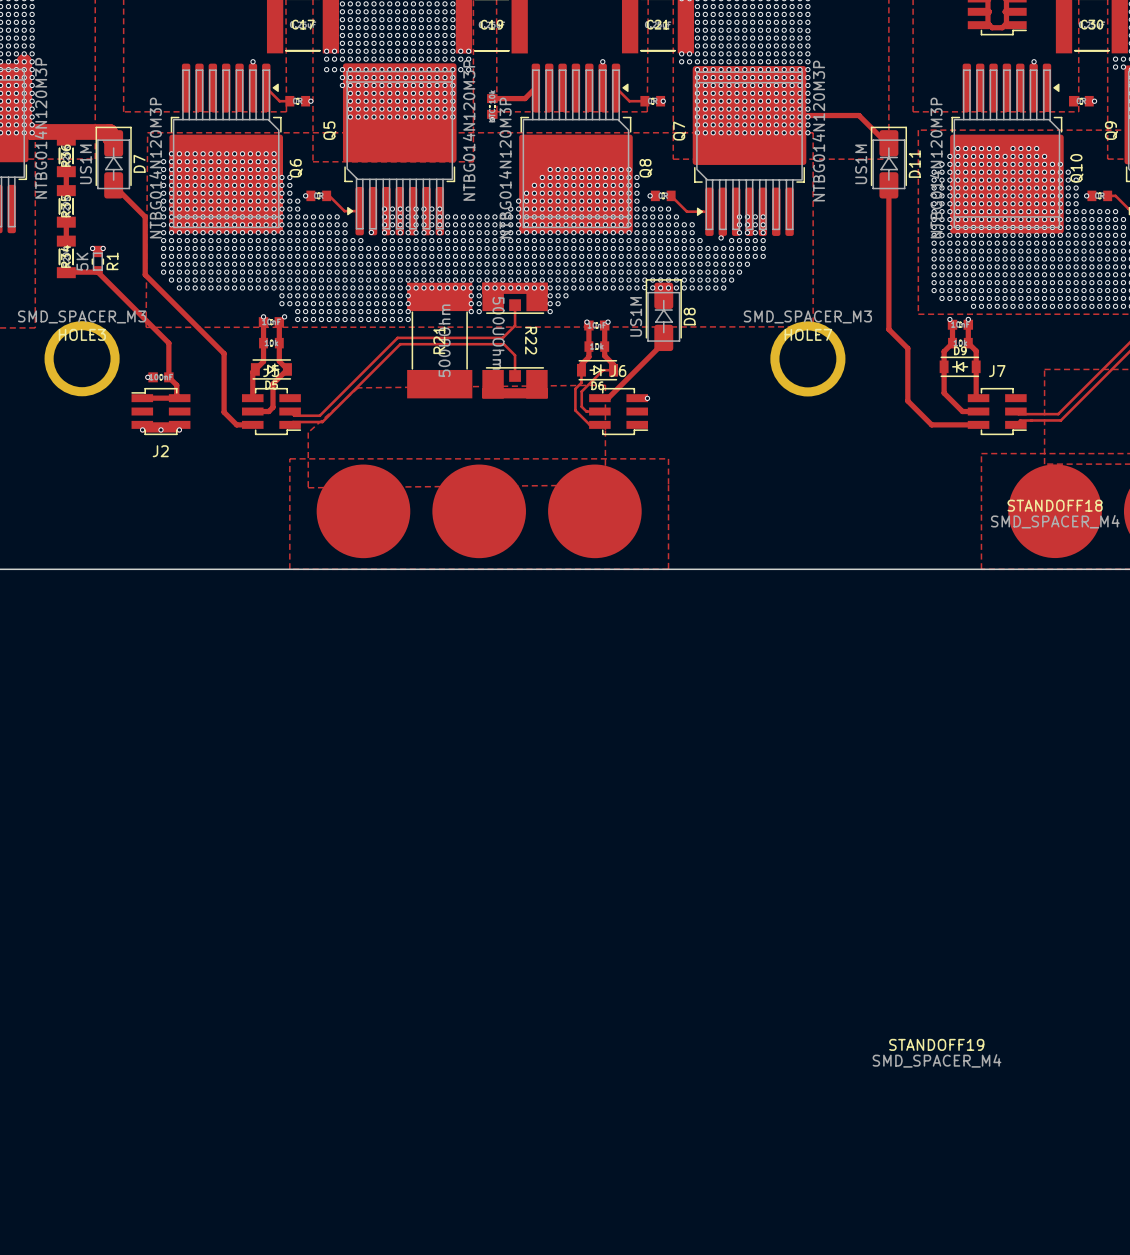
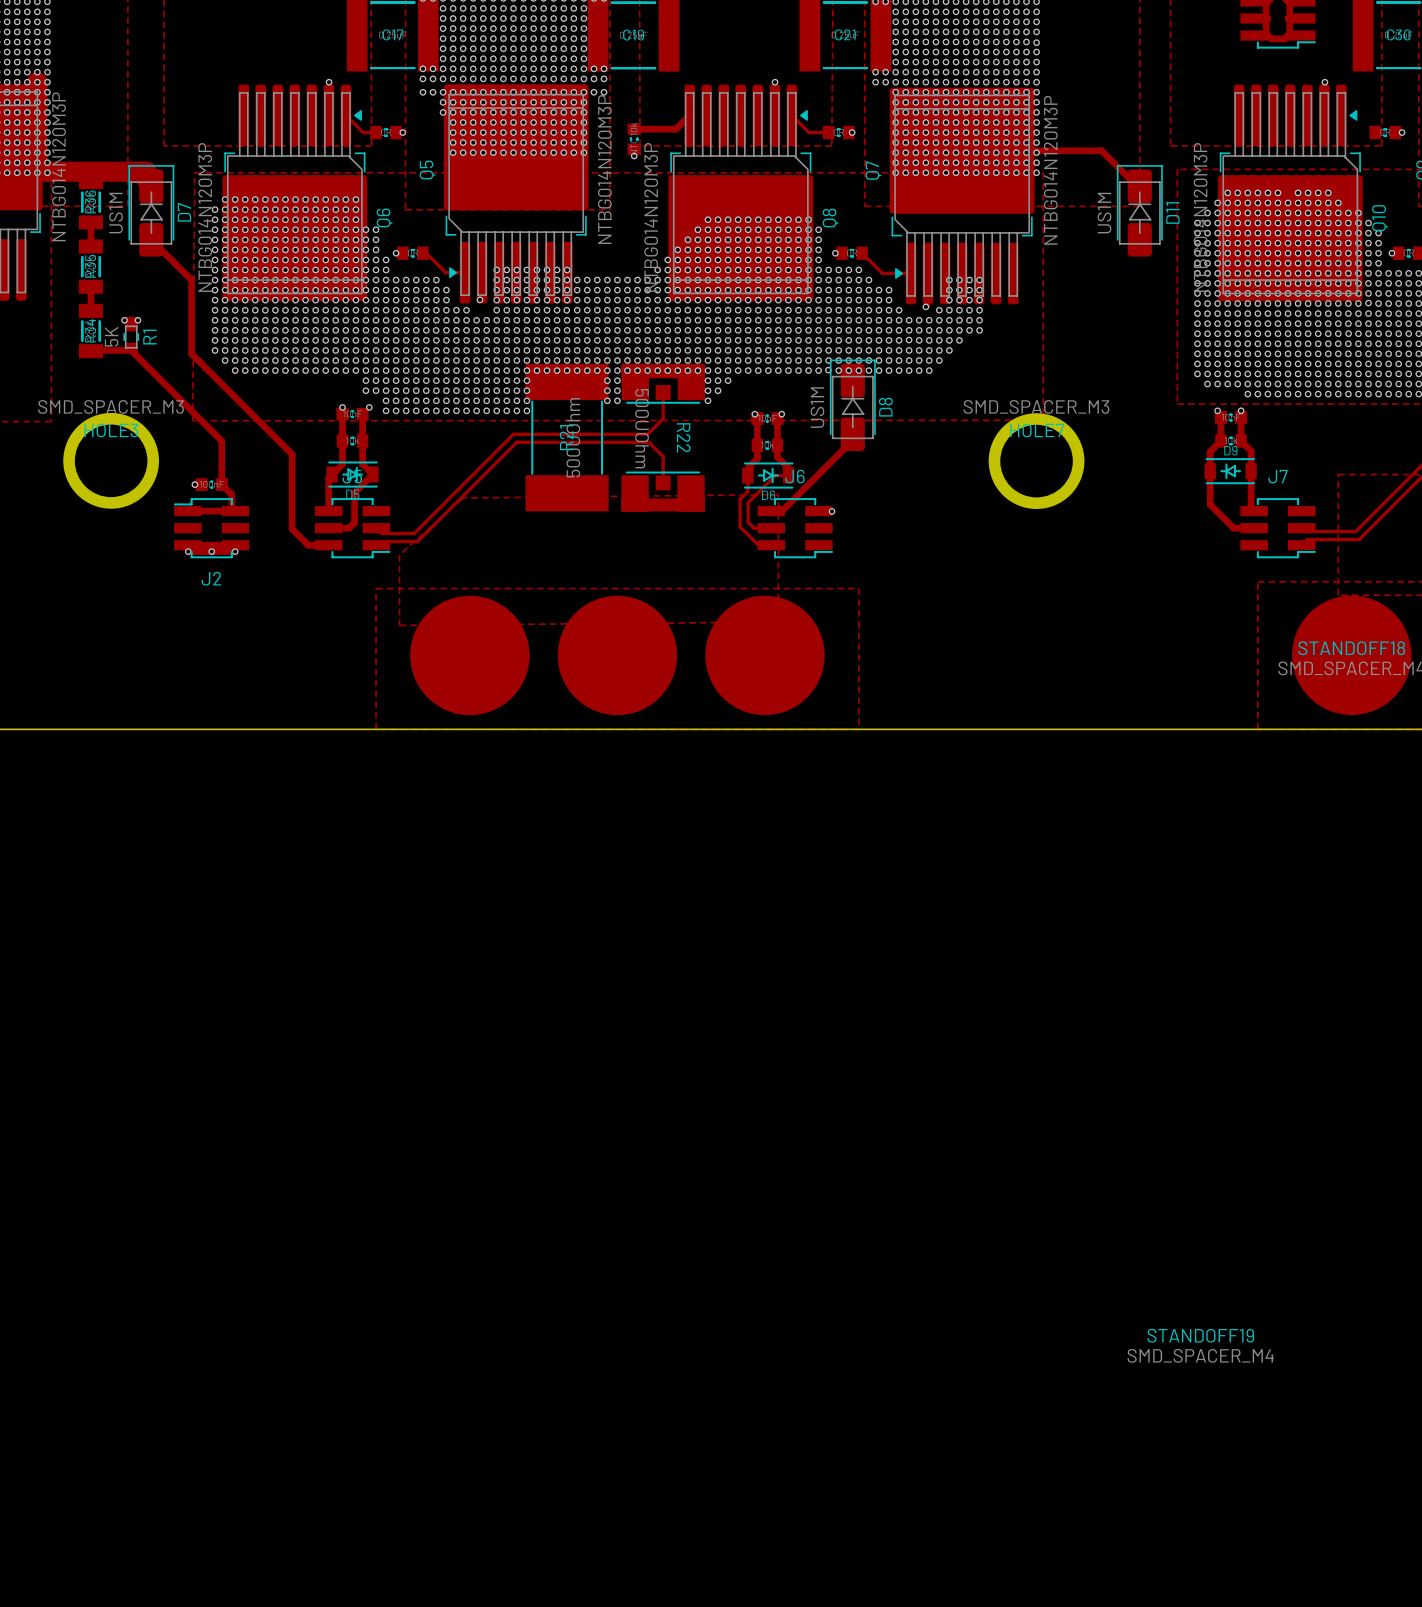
track: (888, 185) (888, 329) (907, 348) (907, 401) (931, 424) (978, 424) -> none

